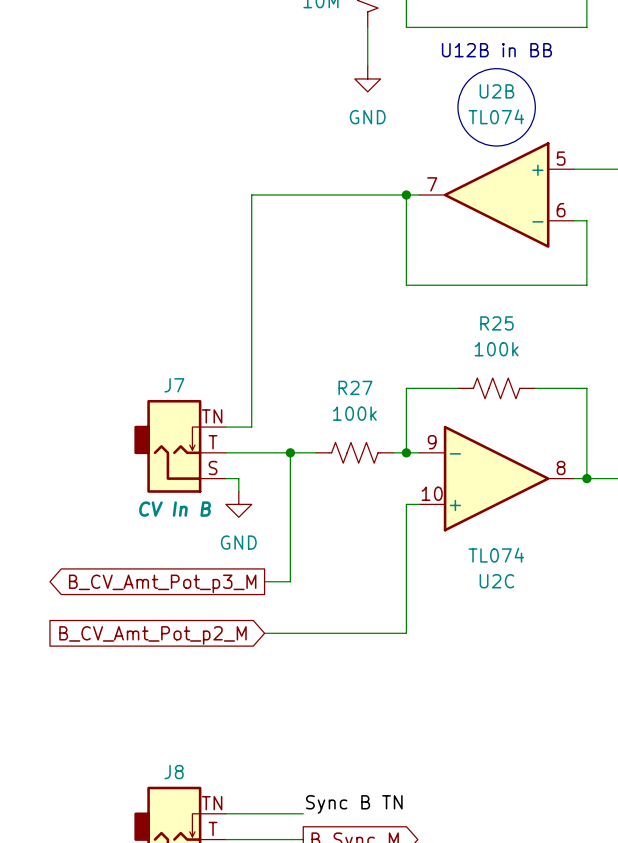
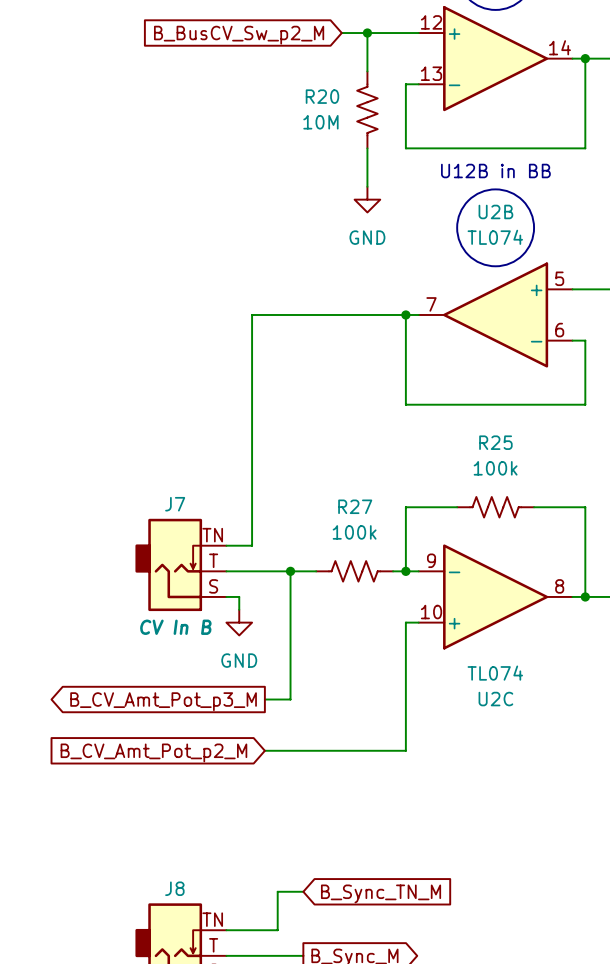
global label: none -> B_Sync_TN_M (381, 893)
label: Sync B TN (354, 804) -> none
wire: (277, 813) (303, 813) -> (277, 930) (277, 891) (303, 891)

